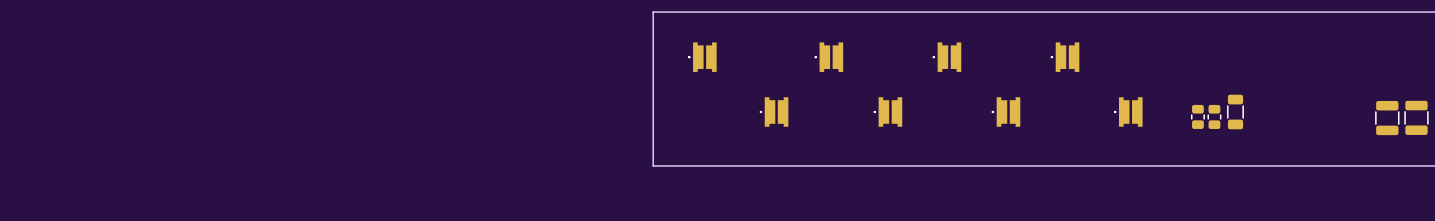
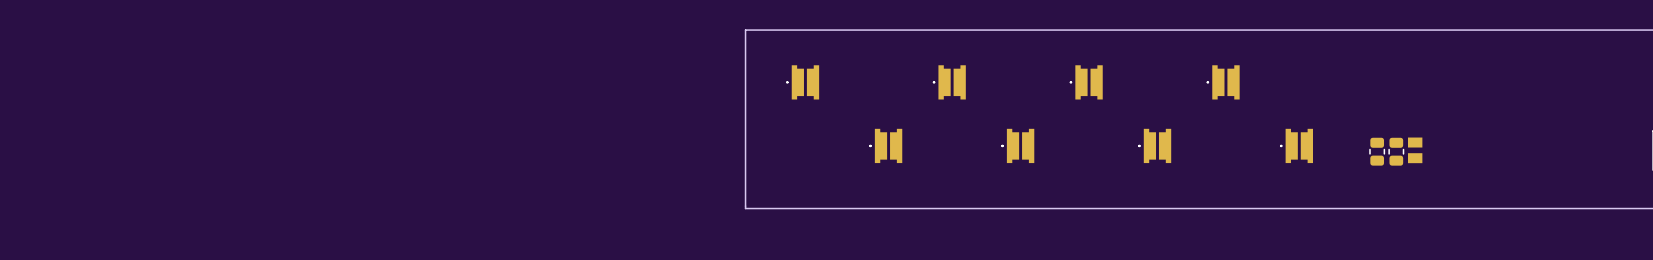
part footprint: [1227, 94, 1244, 130] -> [1408, 137, 1423, 164]
part: (1416, 117) -> none
part: (1387, 118) -> none

